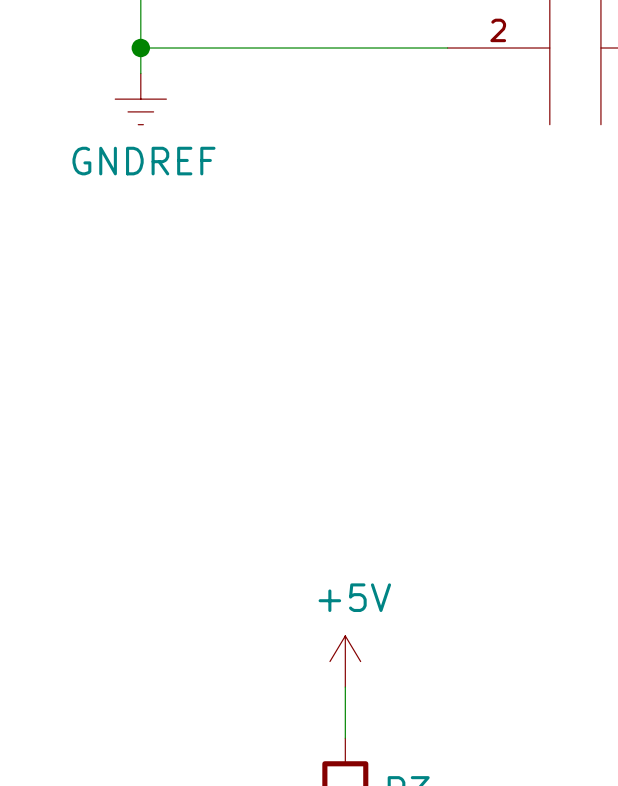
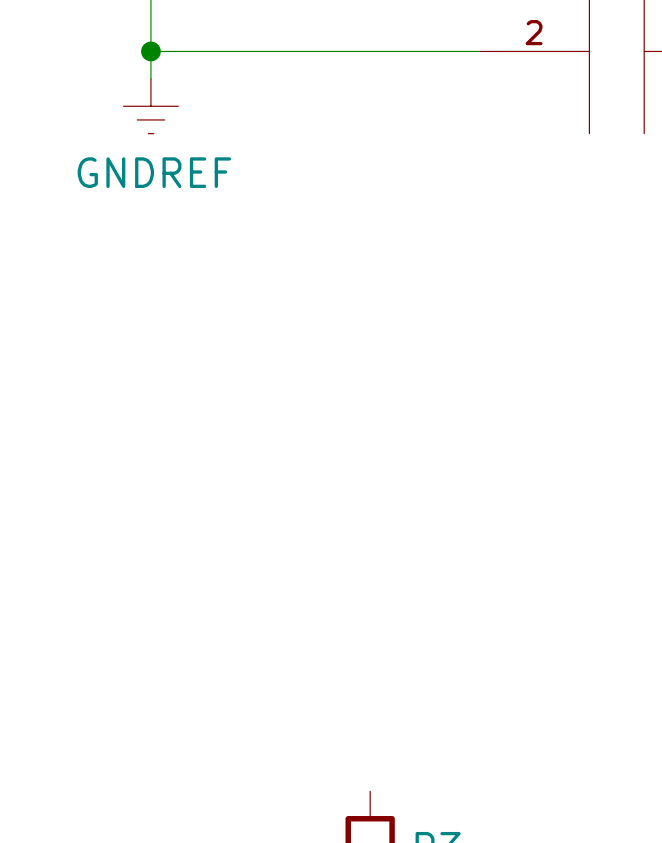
power symbol: +5V (345, 661) -> none
wire: (345, 687) (345, 738) -> none

